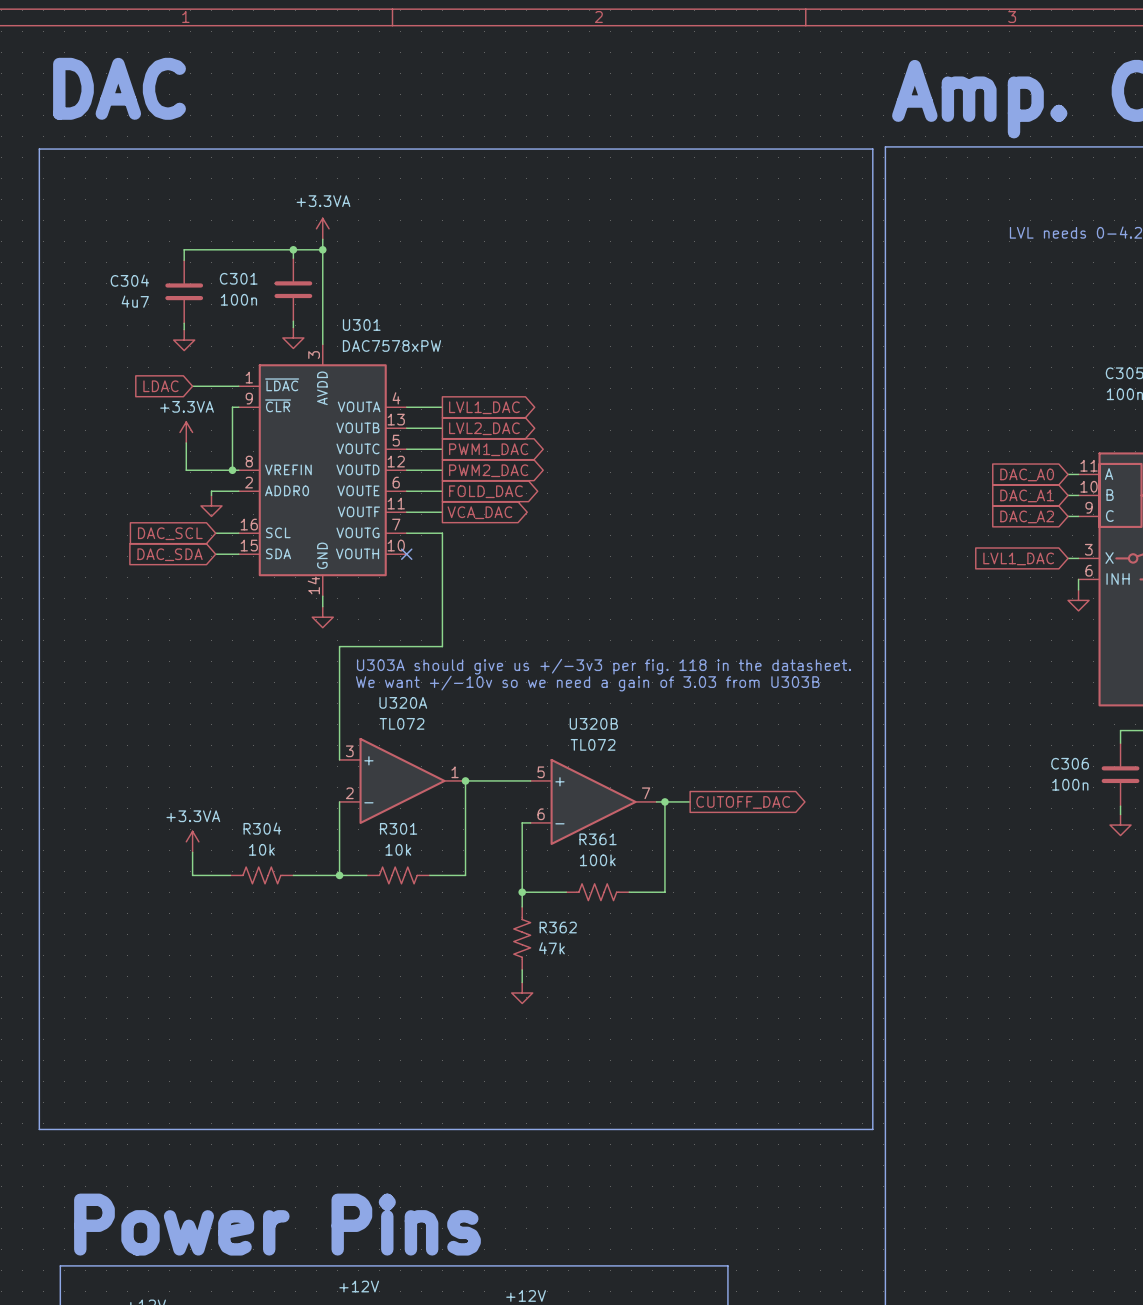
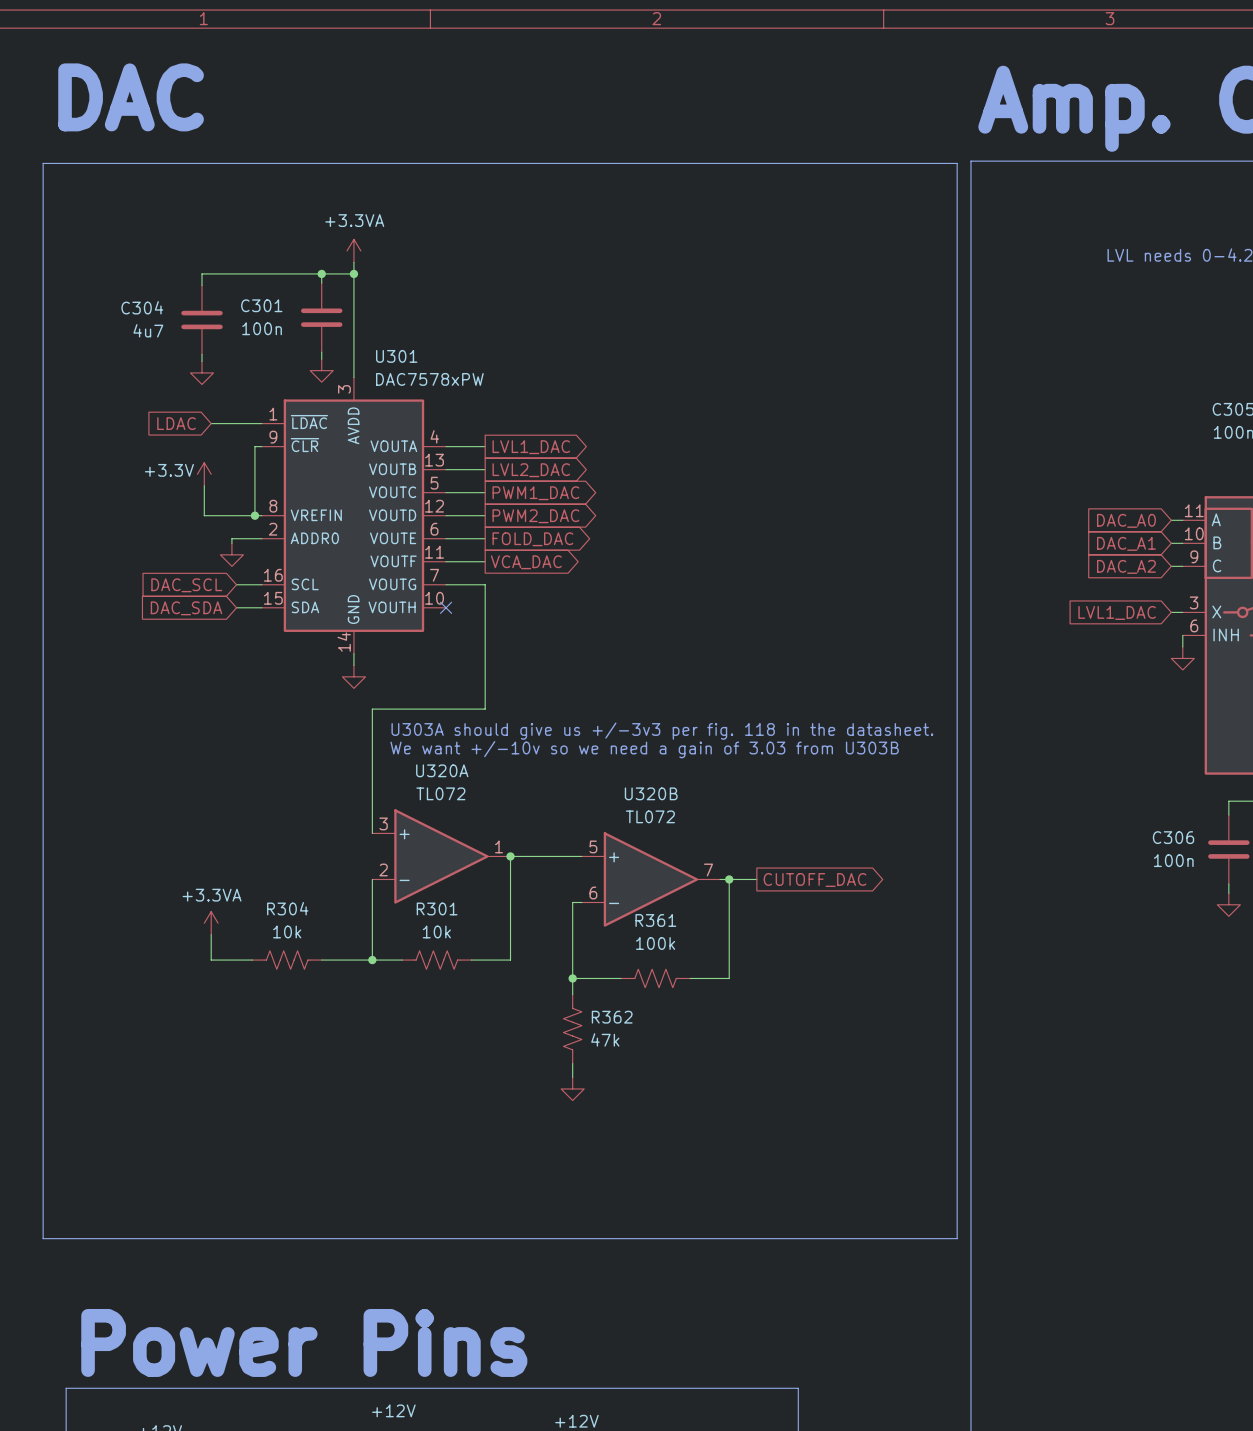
power symbol: +3.3VA (186, 432) -> +3.3V (204, 474)

